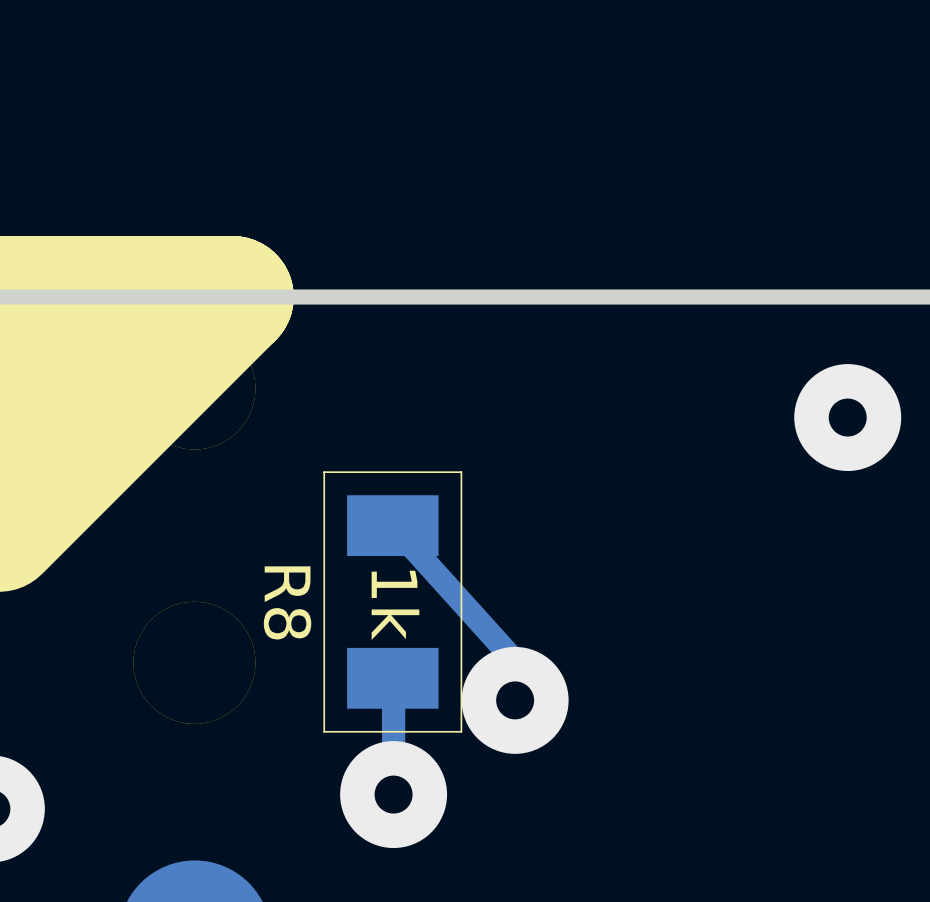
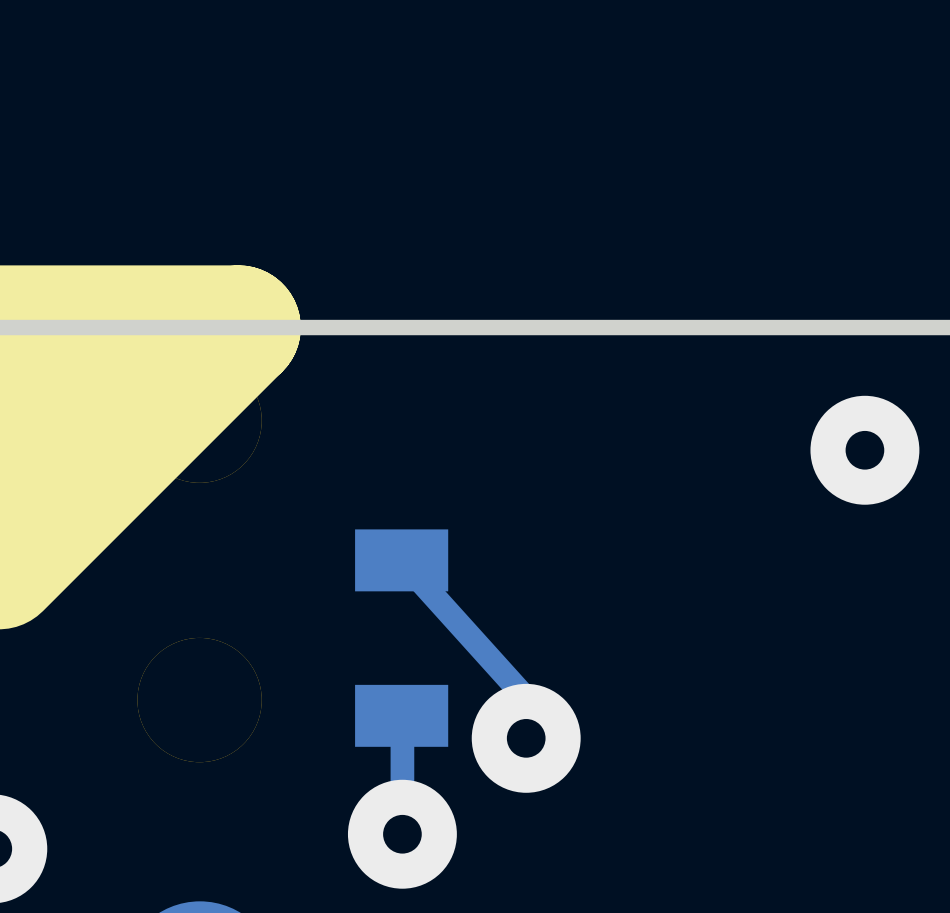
R8: 1k (392, 601) -> none

